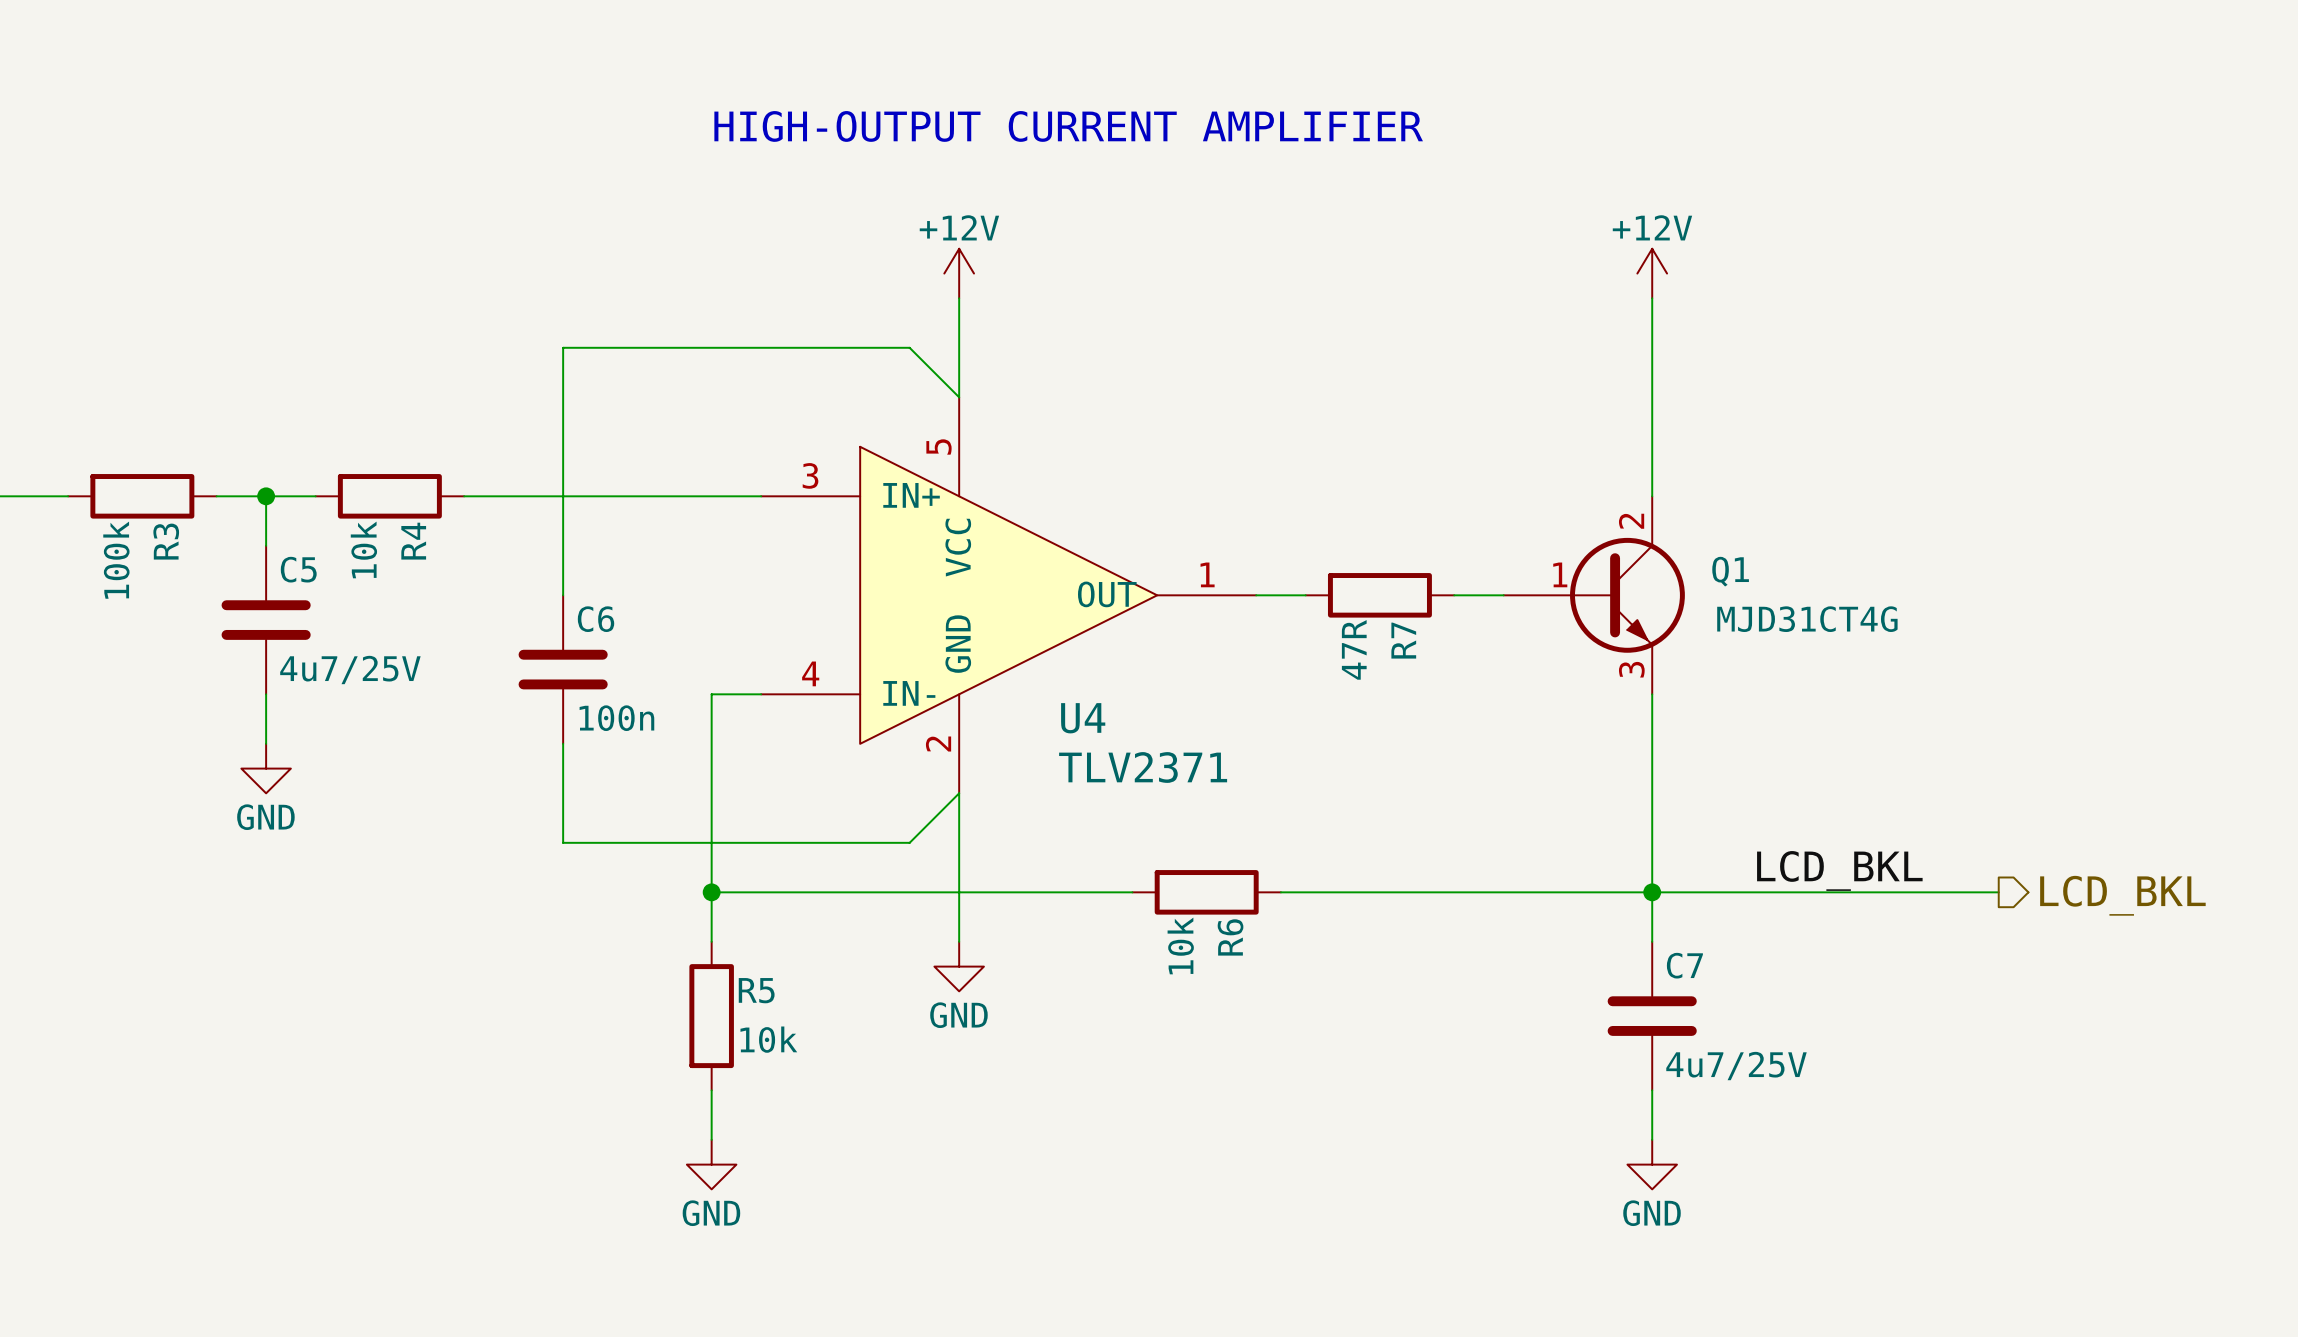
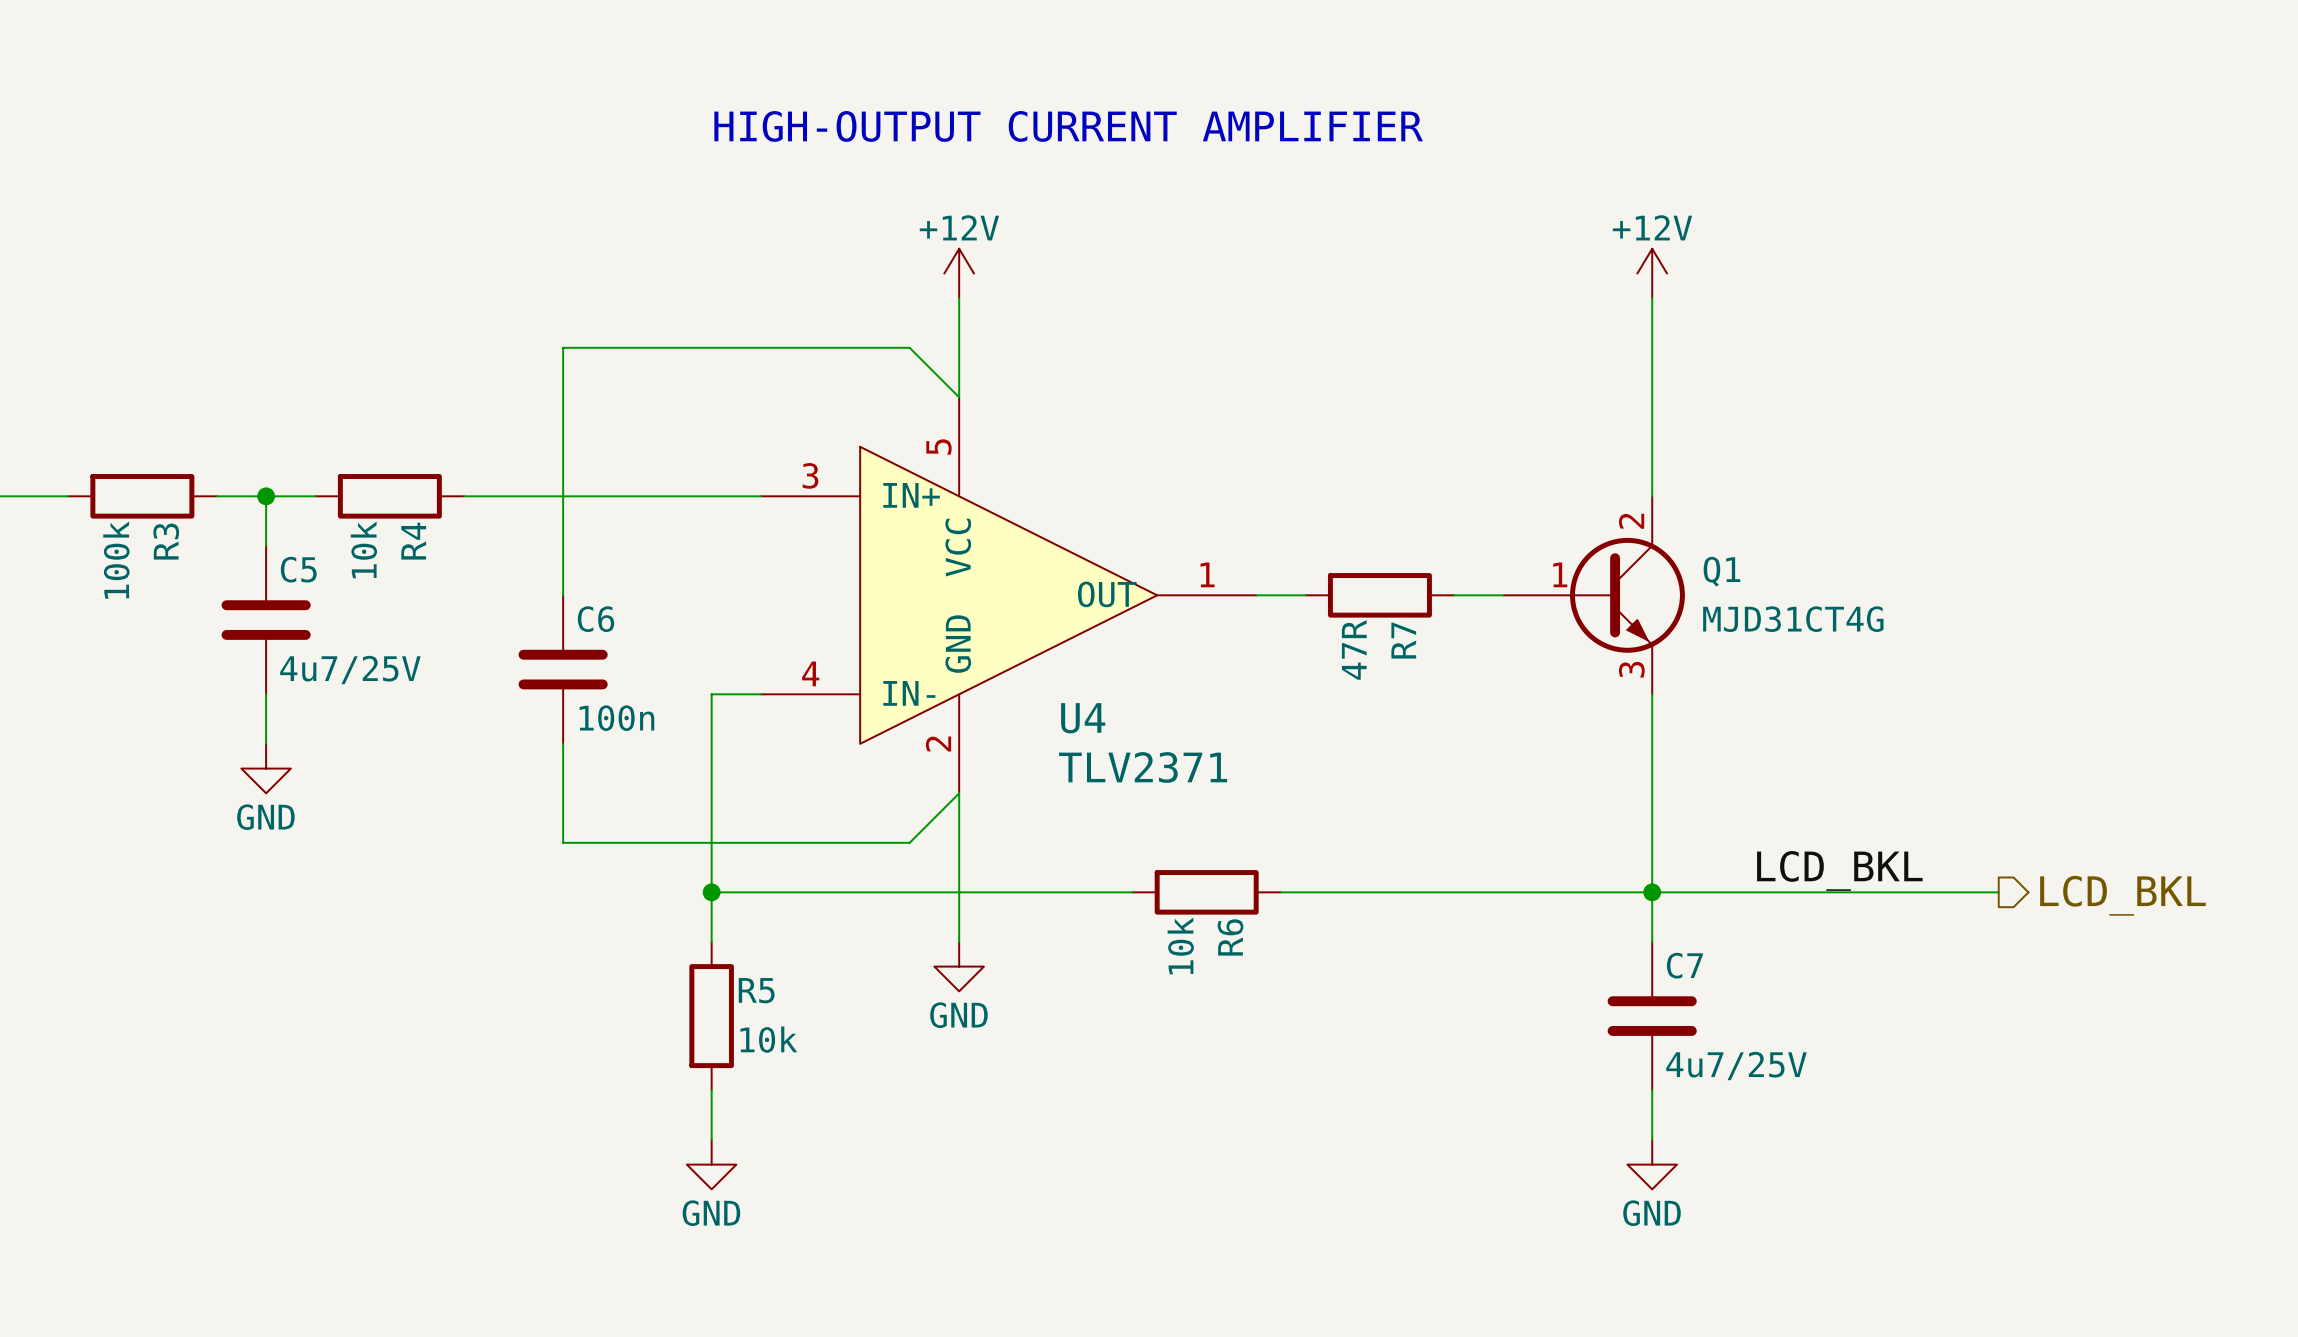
Q1 name position: Q1 (1730, 571) -> Q1 (1721, 571)
Q1 value position: MJD31CT4G (1807, 619) -> MJD31CT4G (1793, 619)

